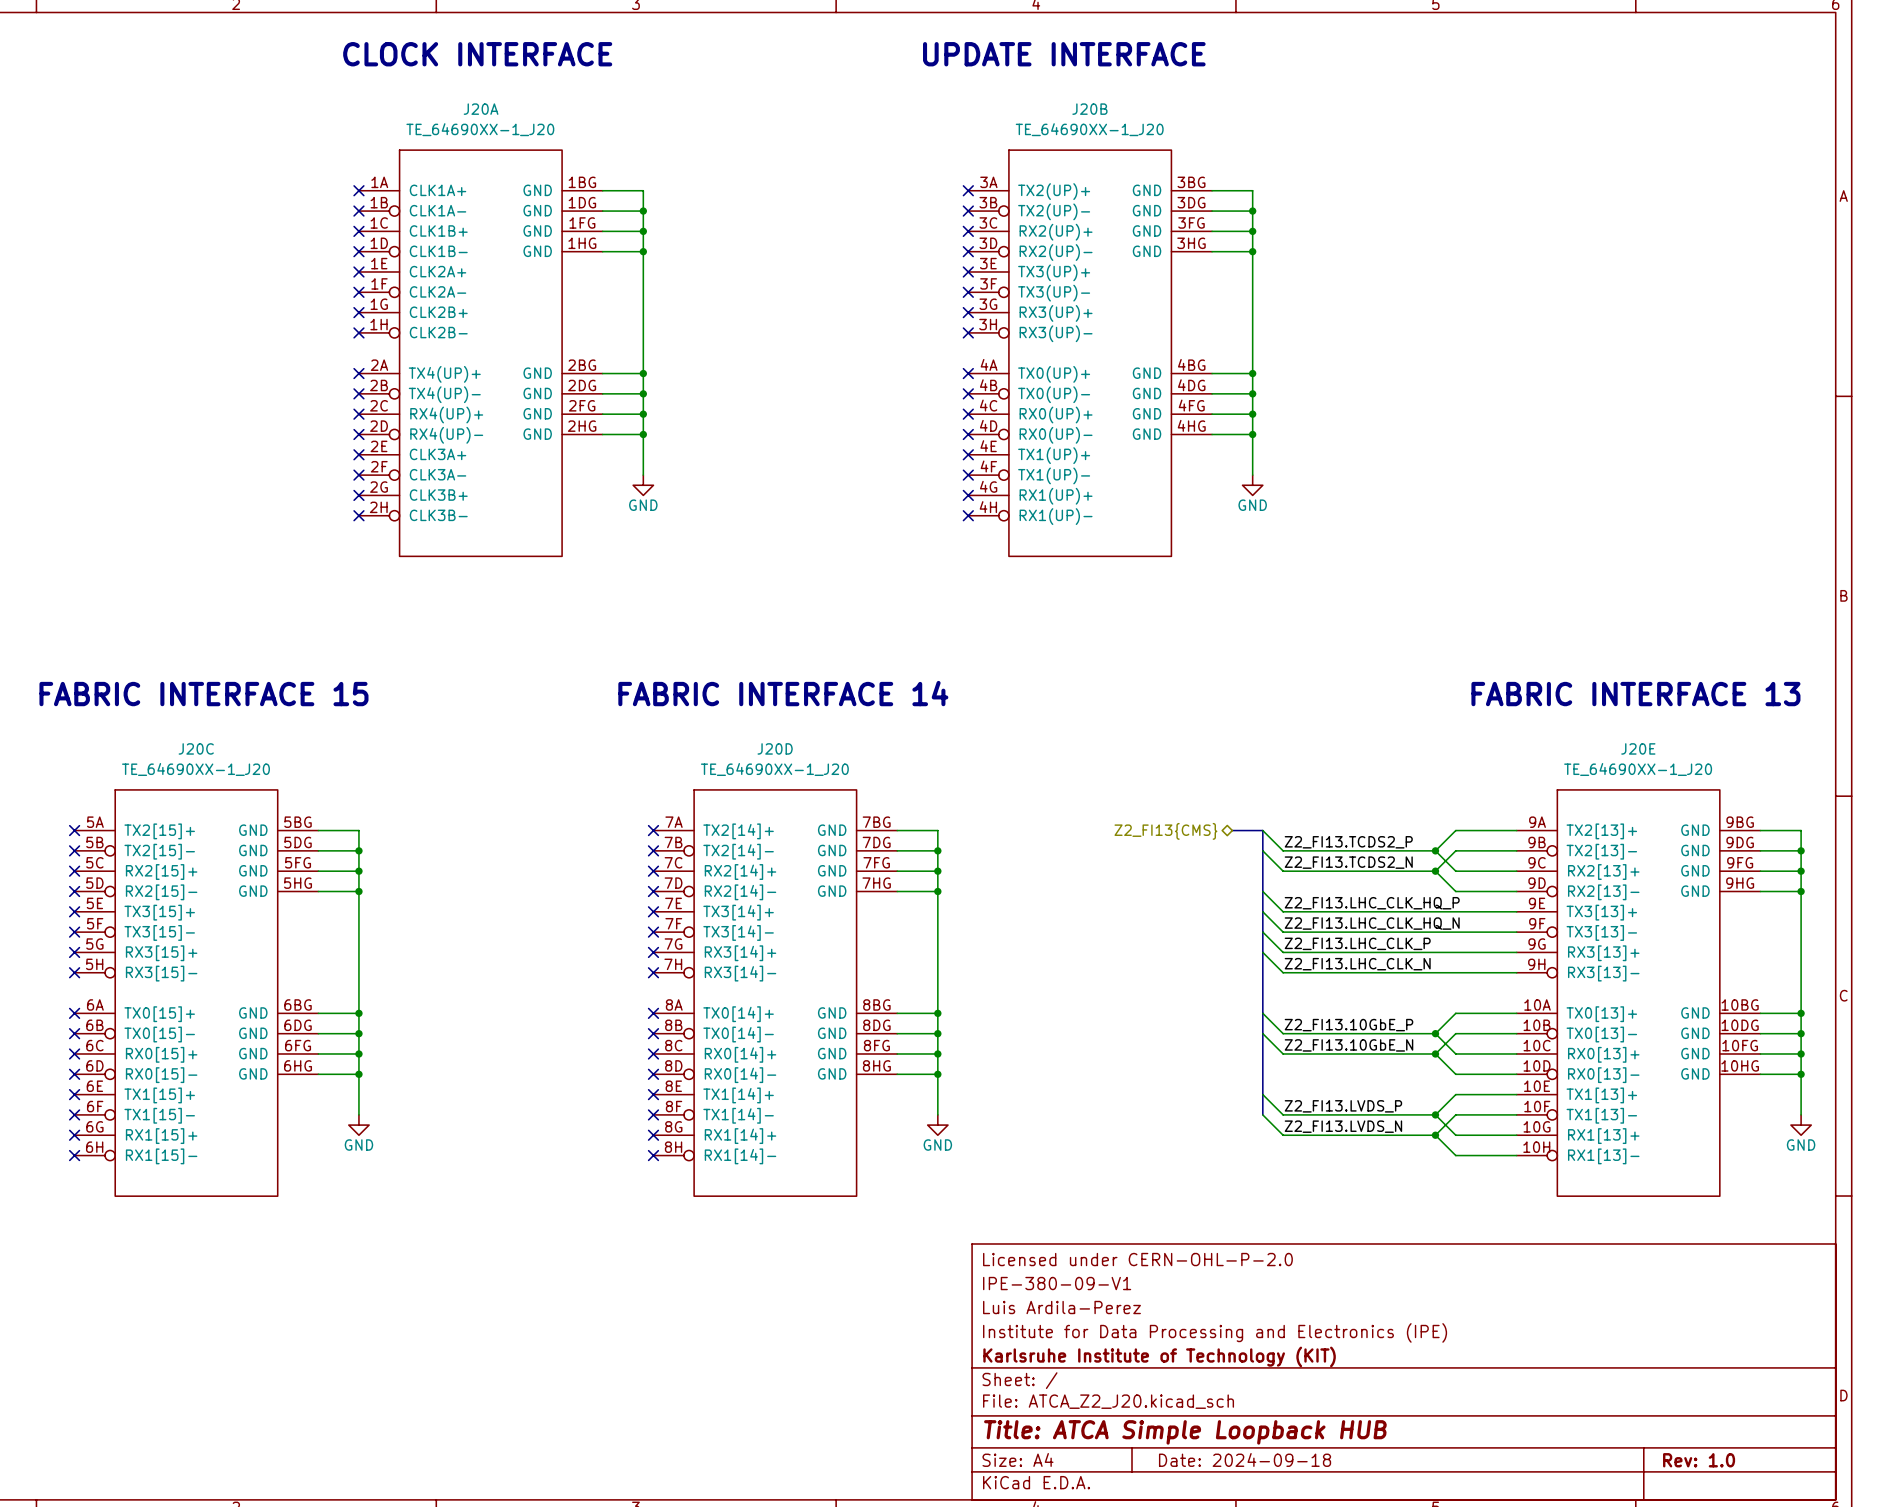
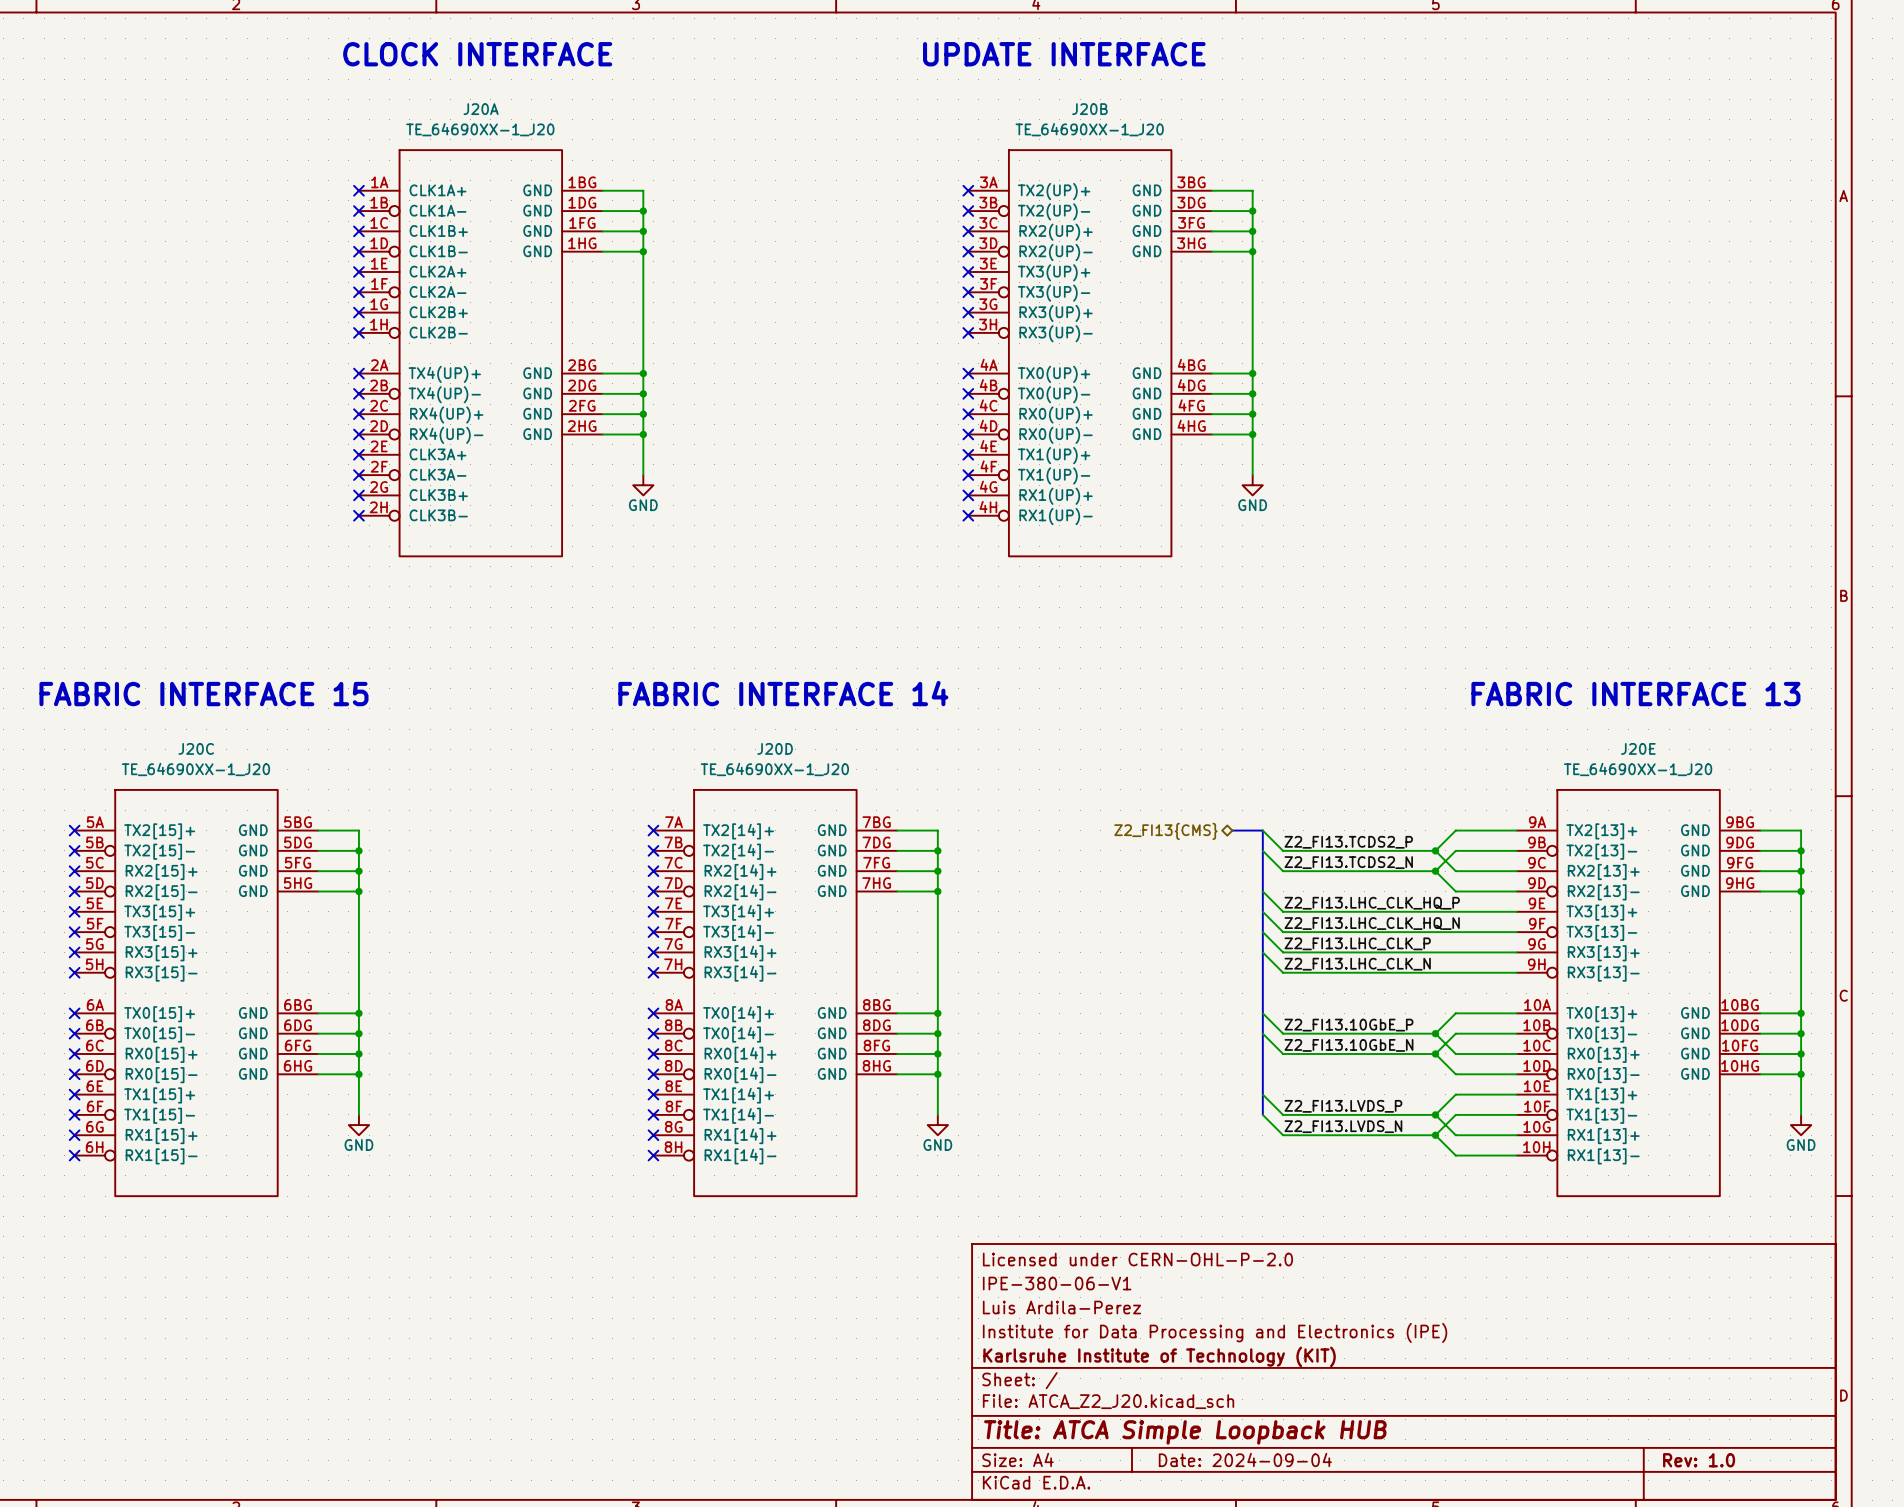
title block: IPE-380-09-V1 (1057, 1283) -> IPE-380-06-V1 (1057, 1283)
title block: Date: 2024-09-18 (1245, 1459) -> Date: 2024-09-04 (1245, 1459)

